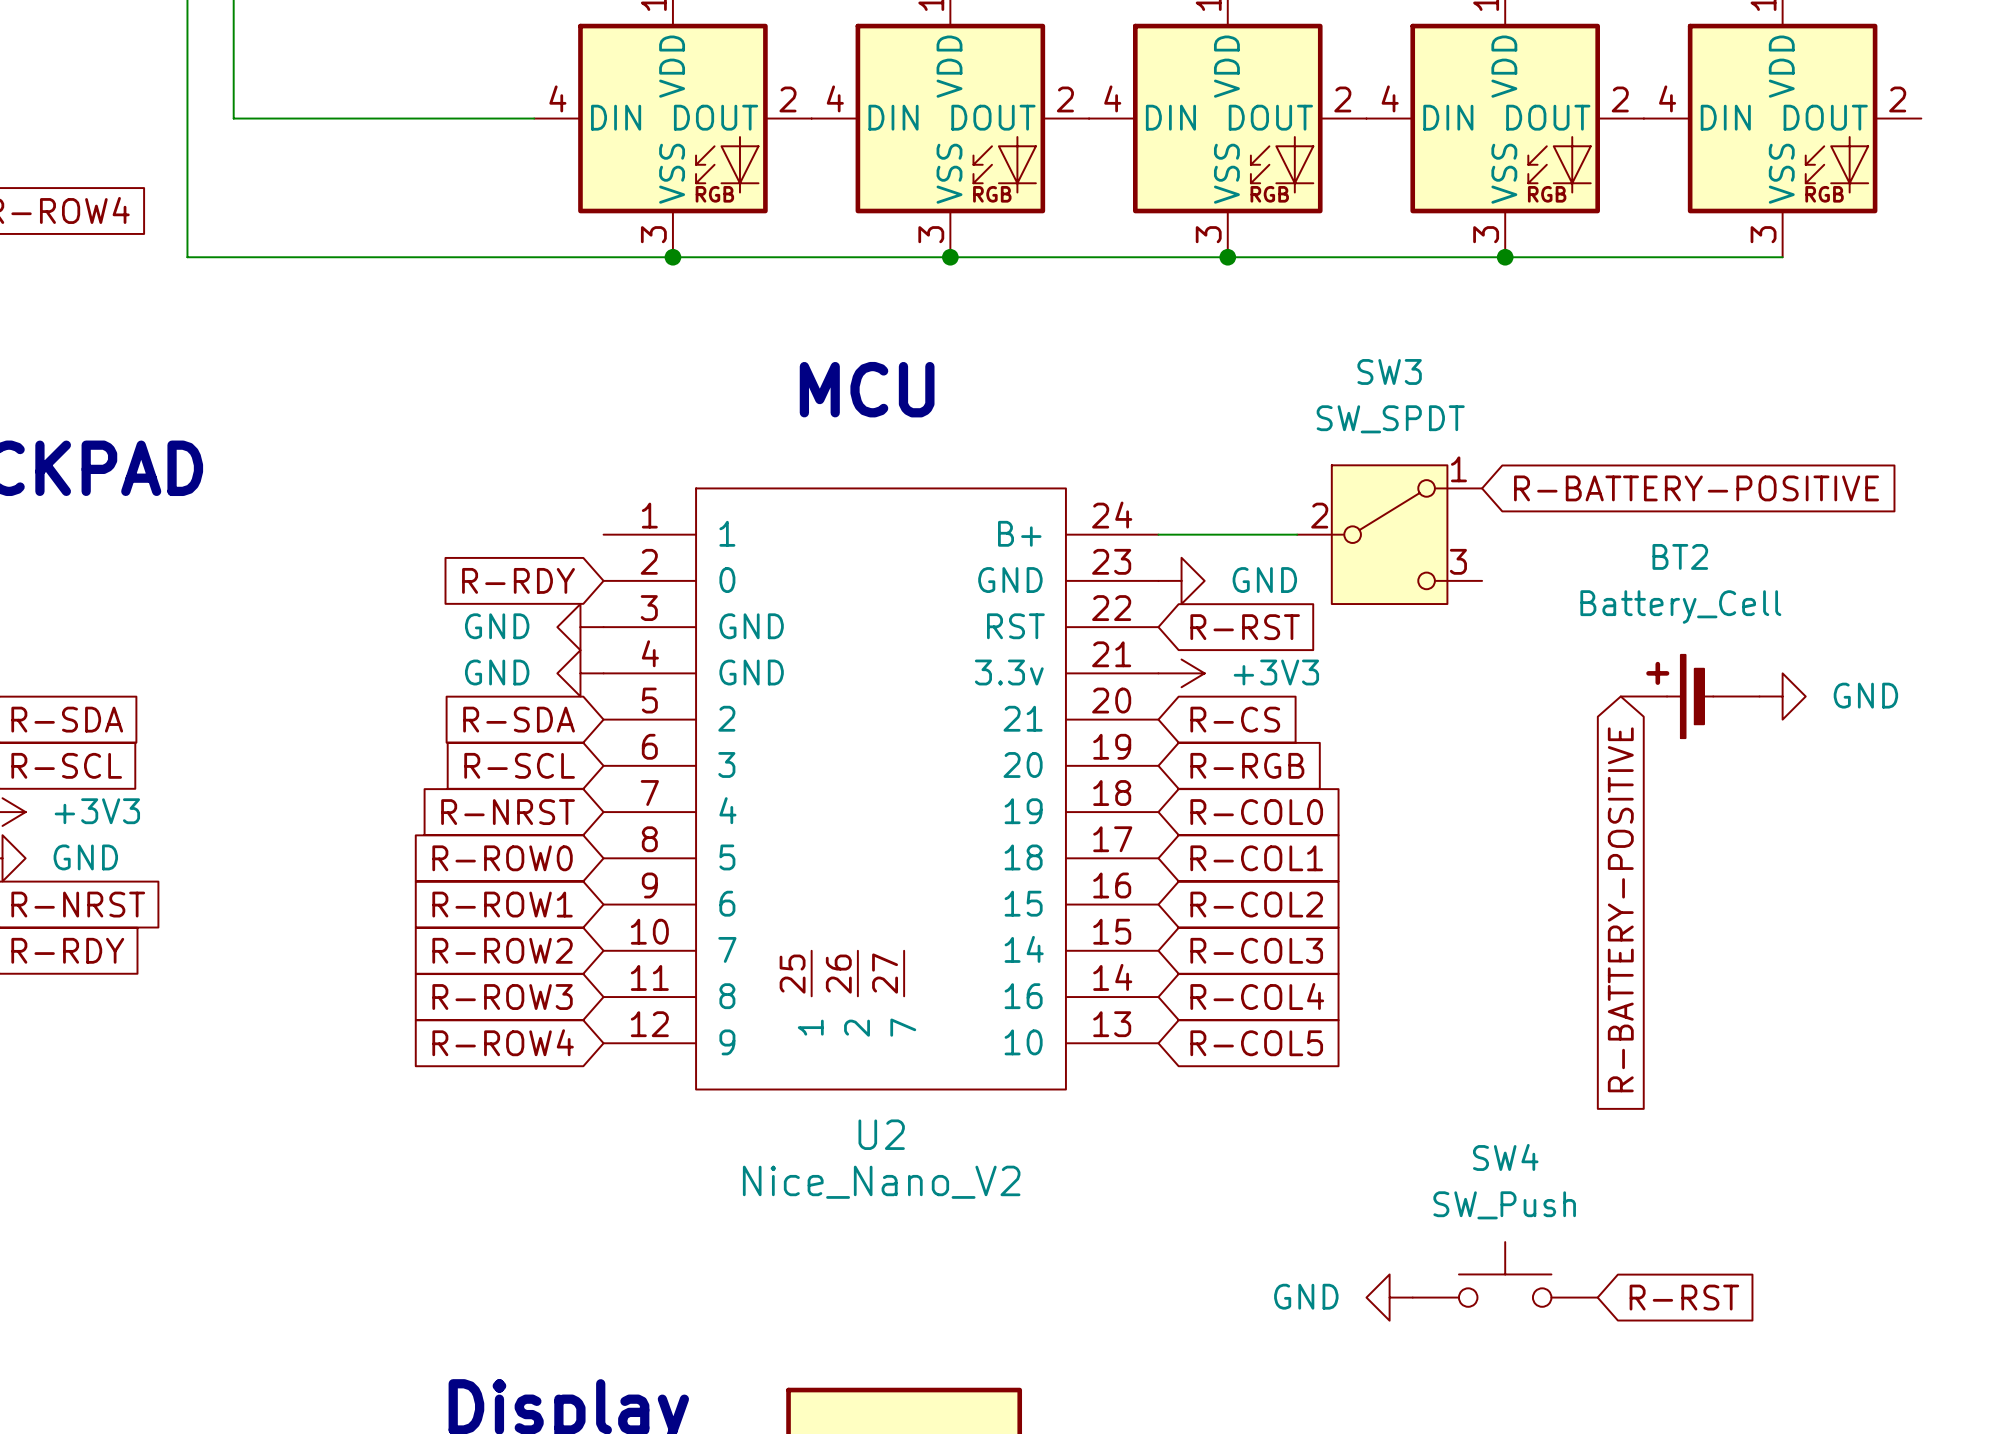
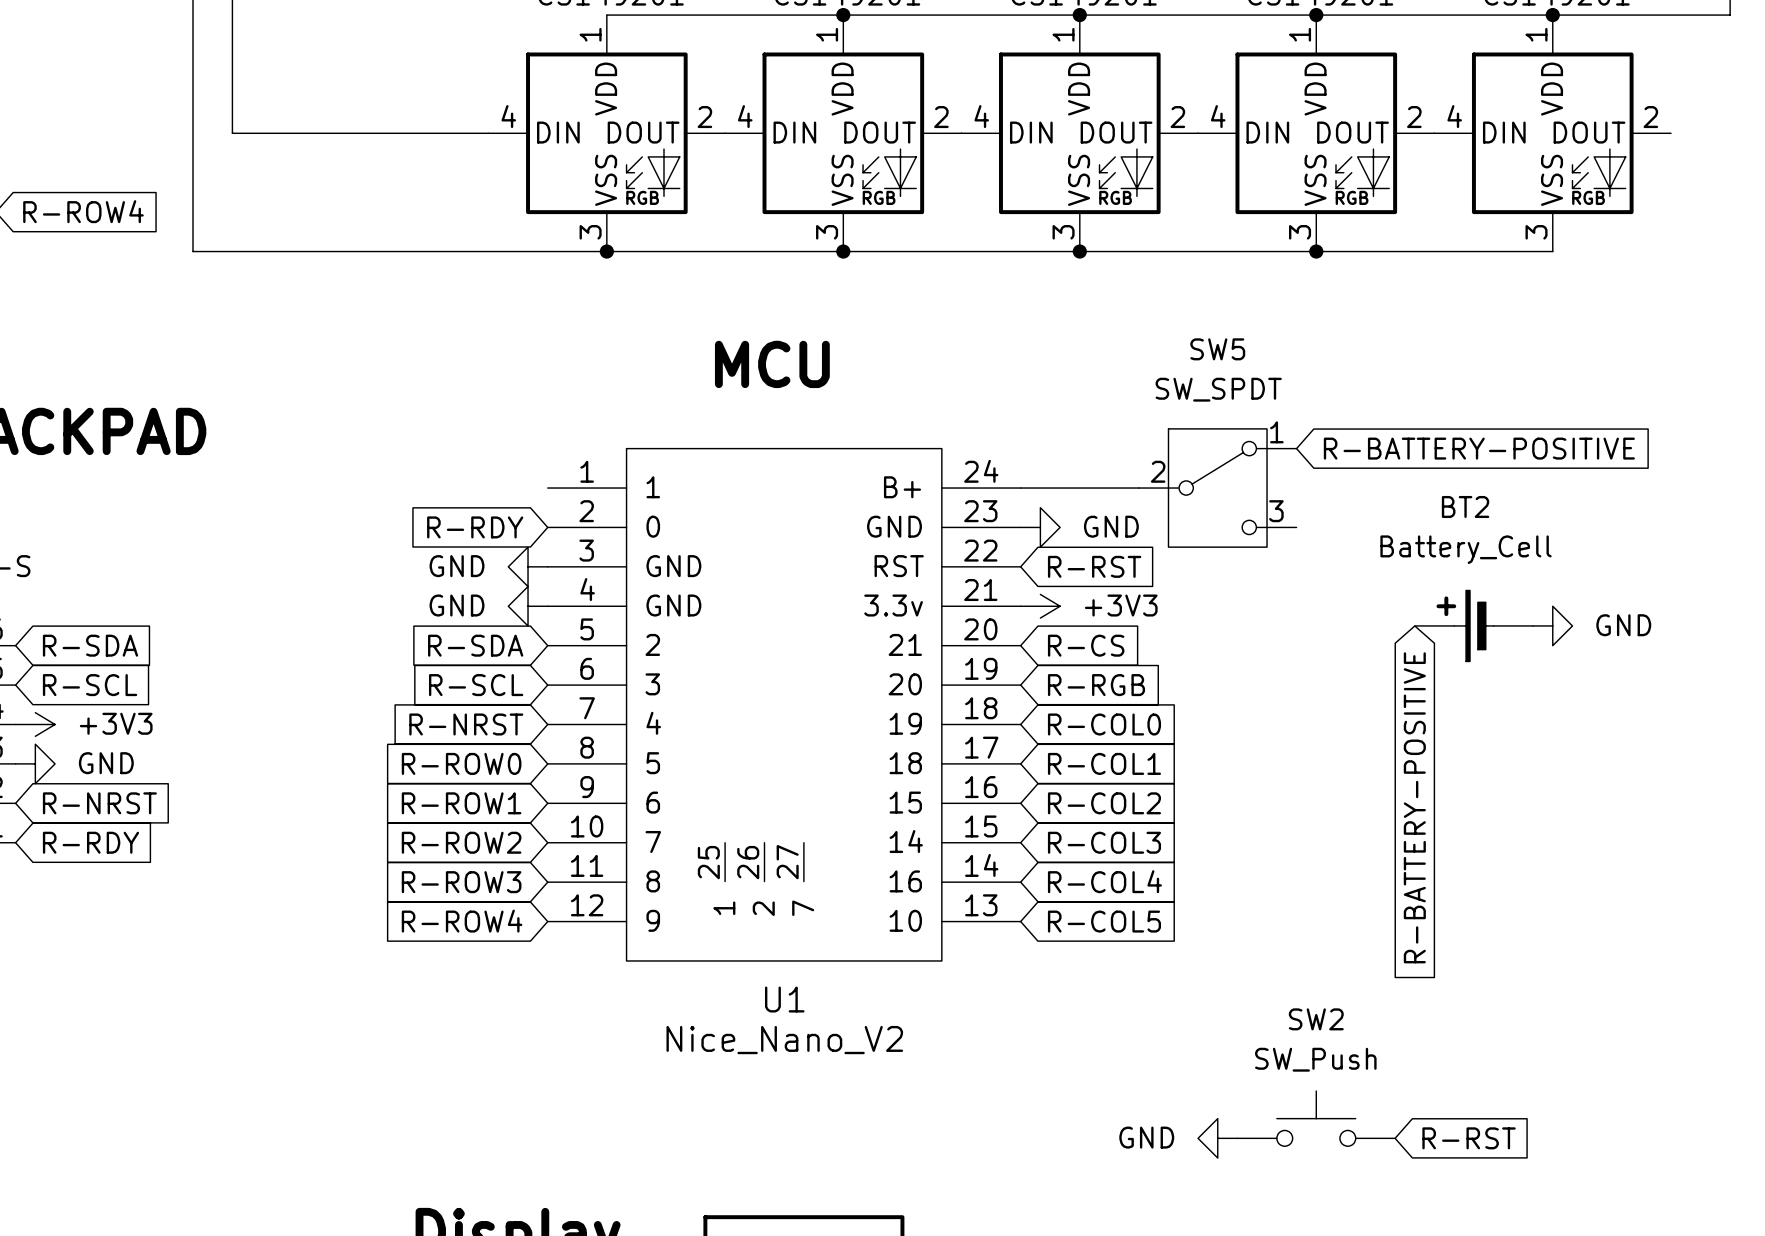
SW3 name: SW3 (1389, 371) -> SW5 (1217, 349)
U2 name: U2 (881, 1134) -> U1 (784, 999)
SW4 name: SW4 (1505, 1157) -> SW2 (1316, 1019)

